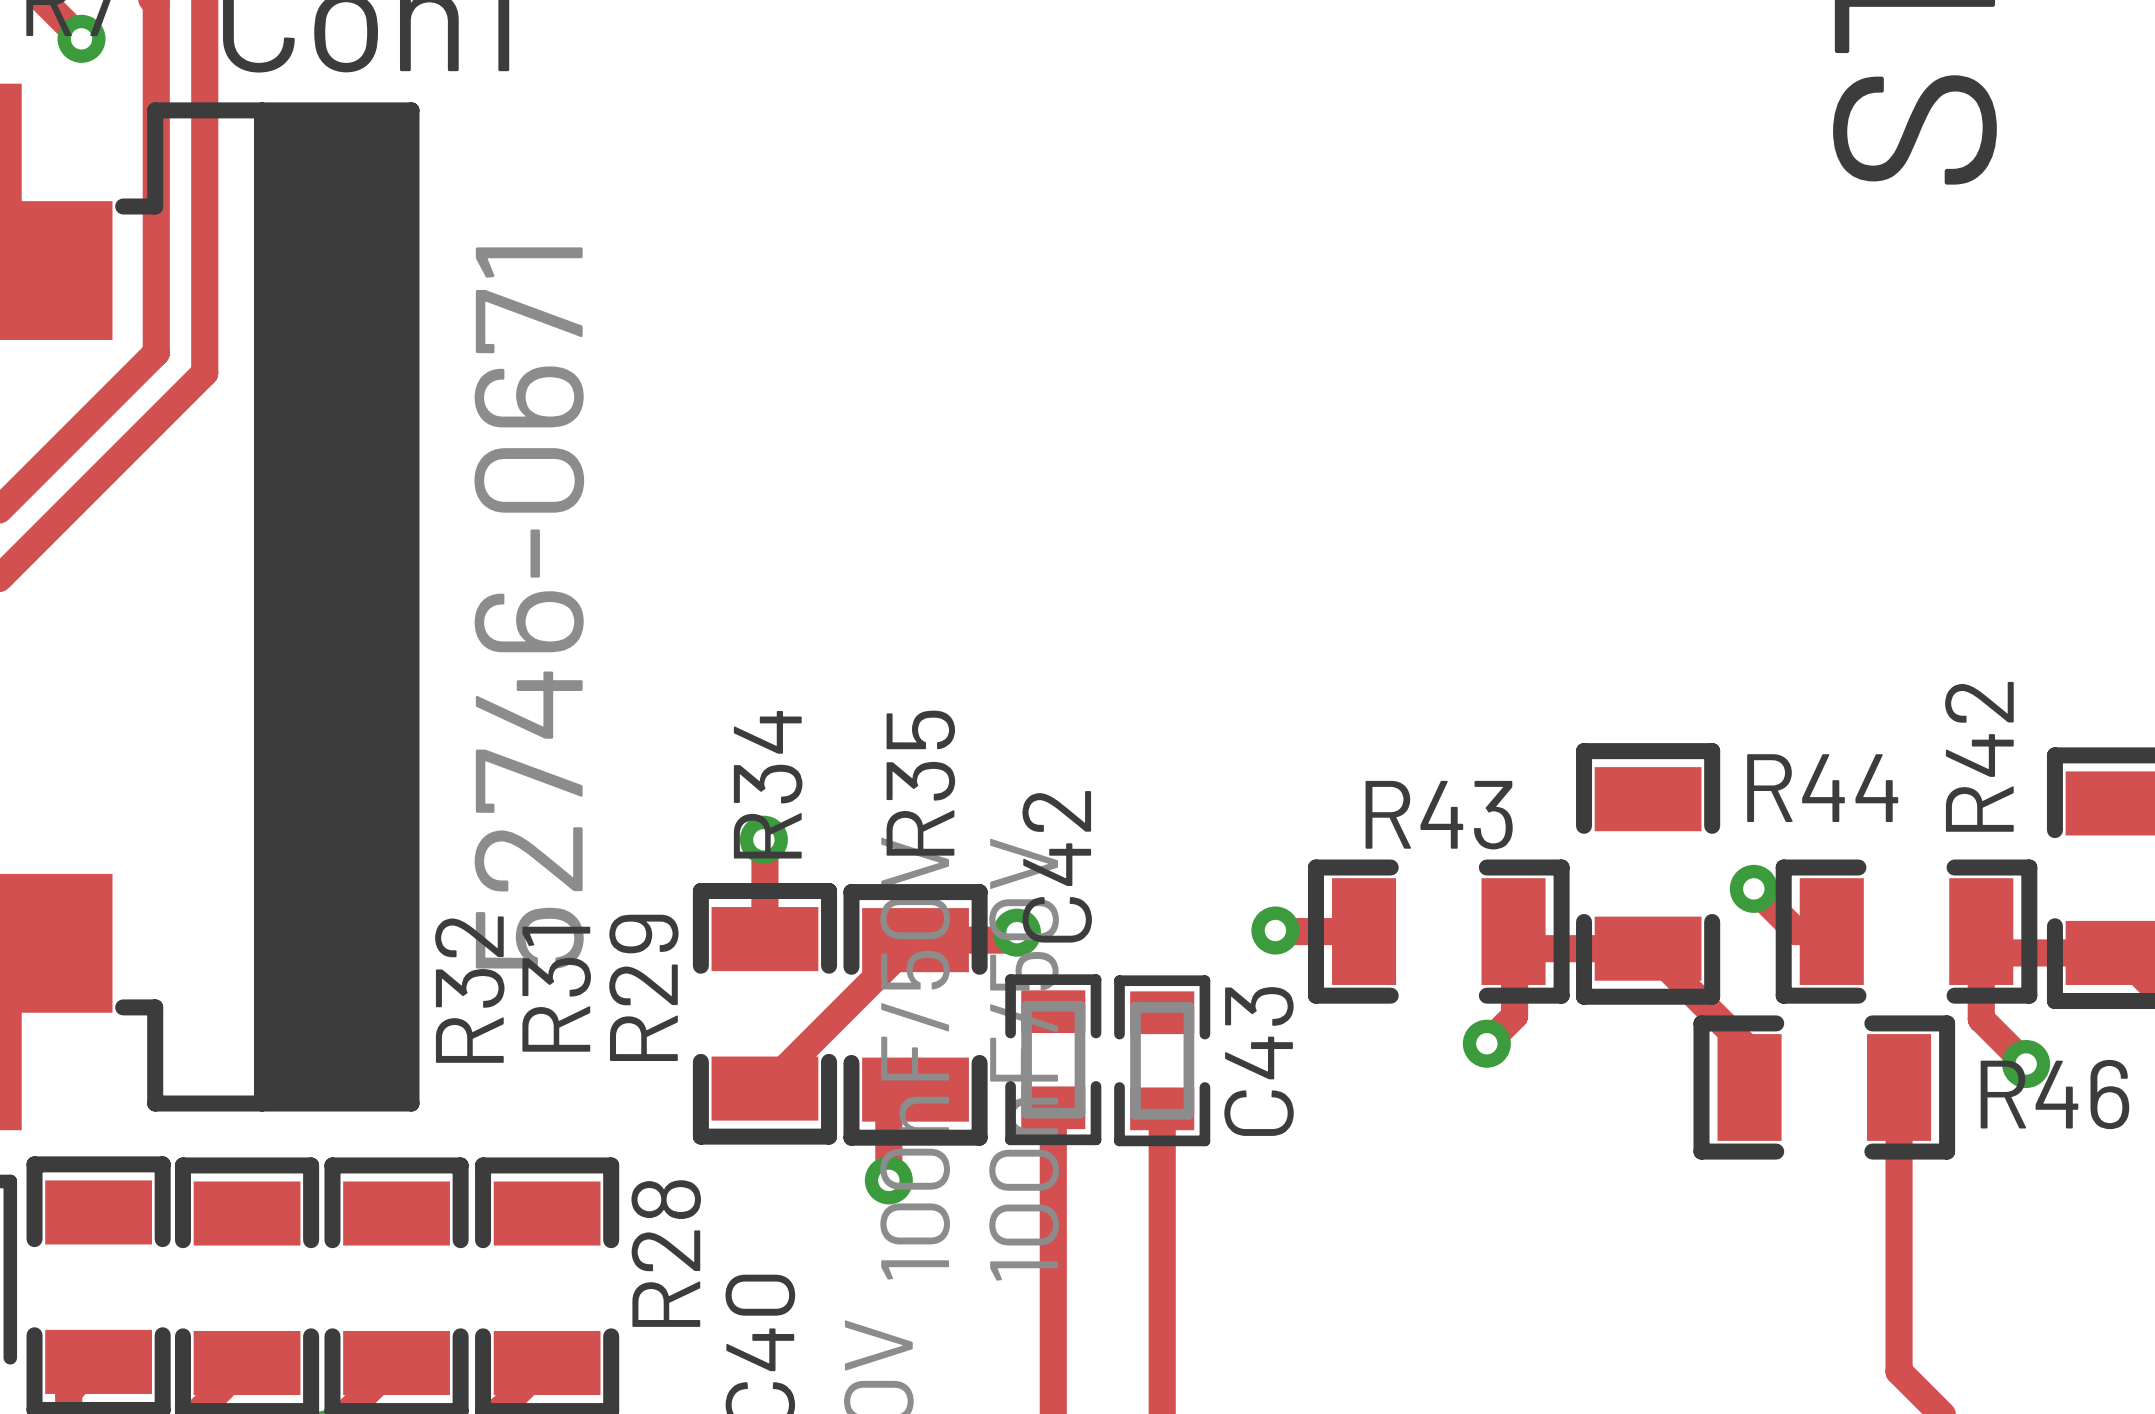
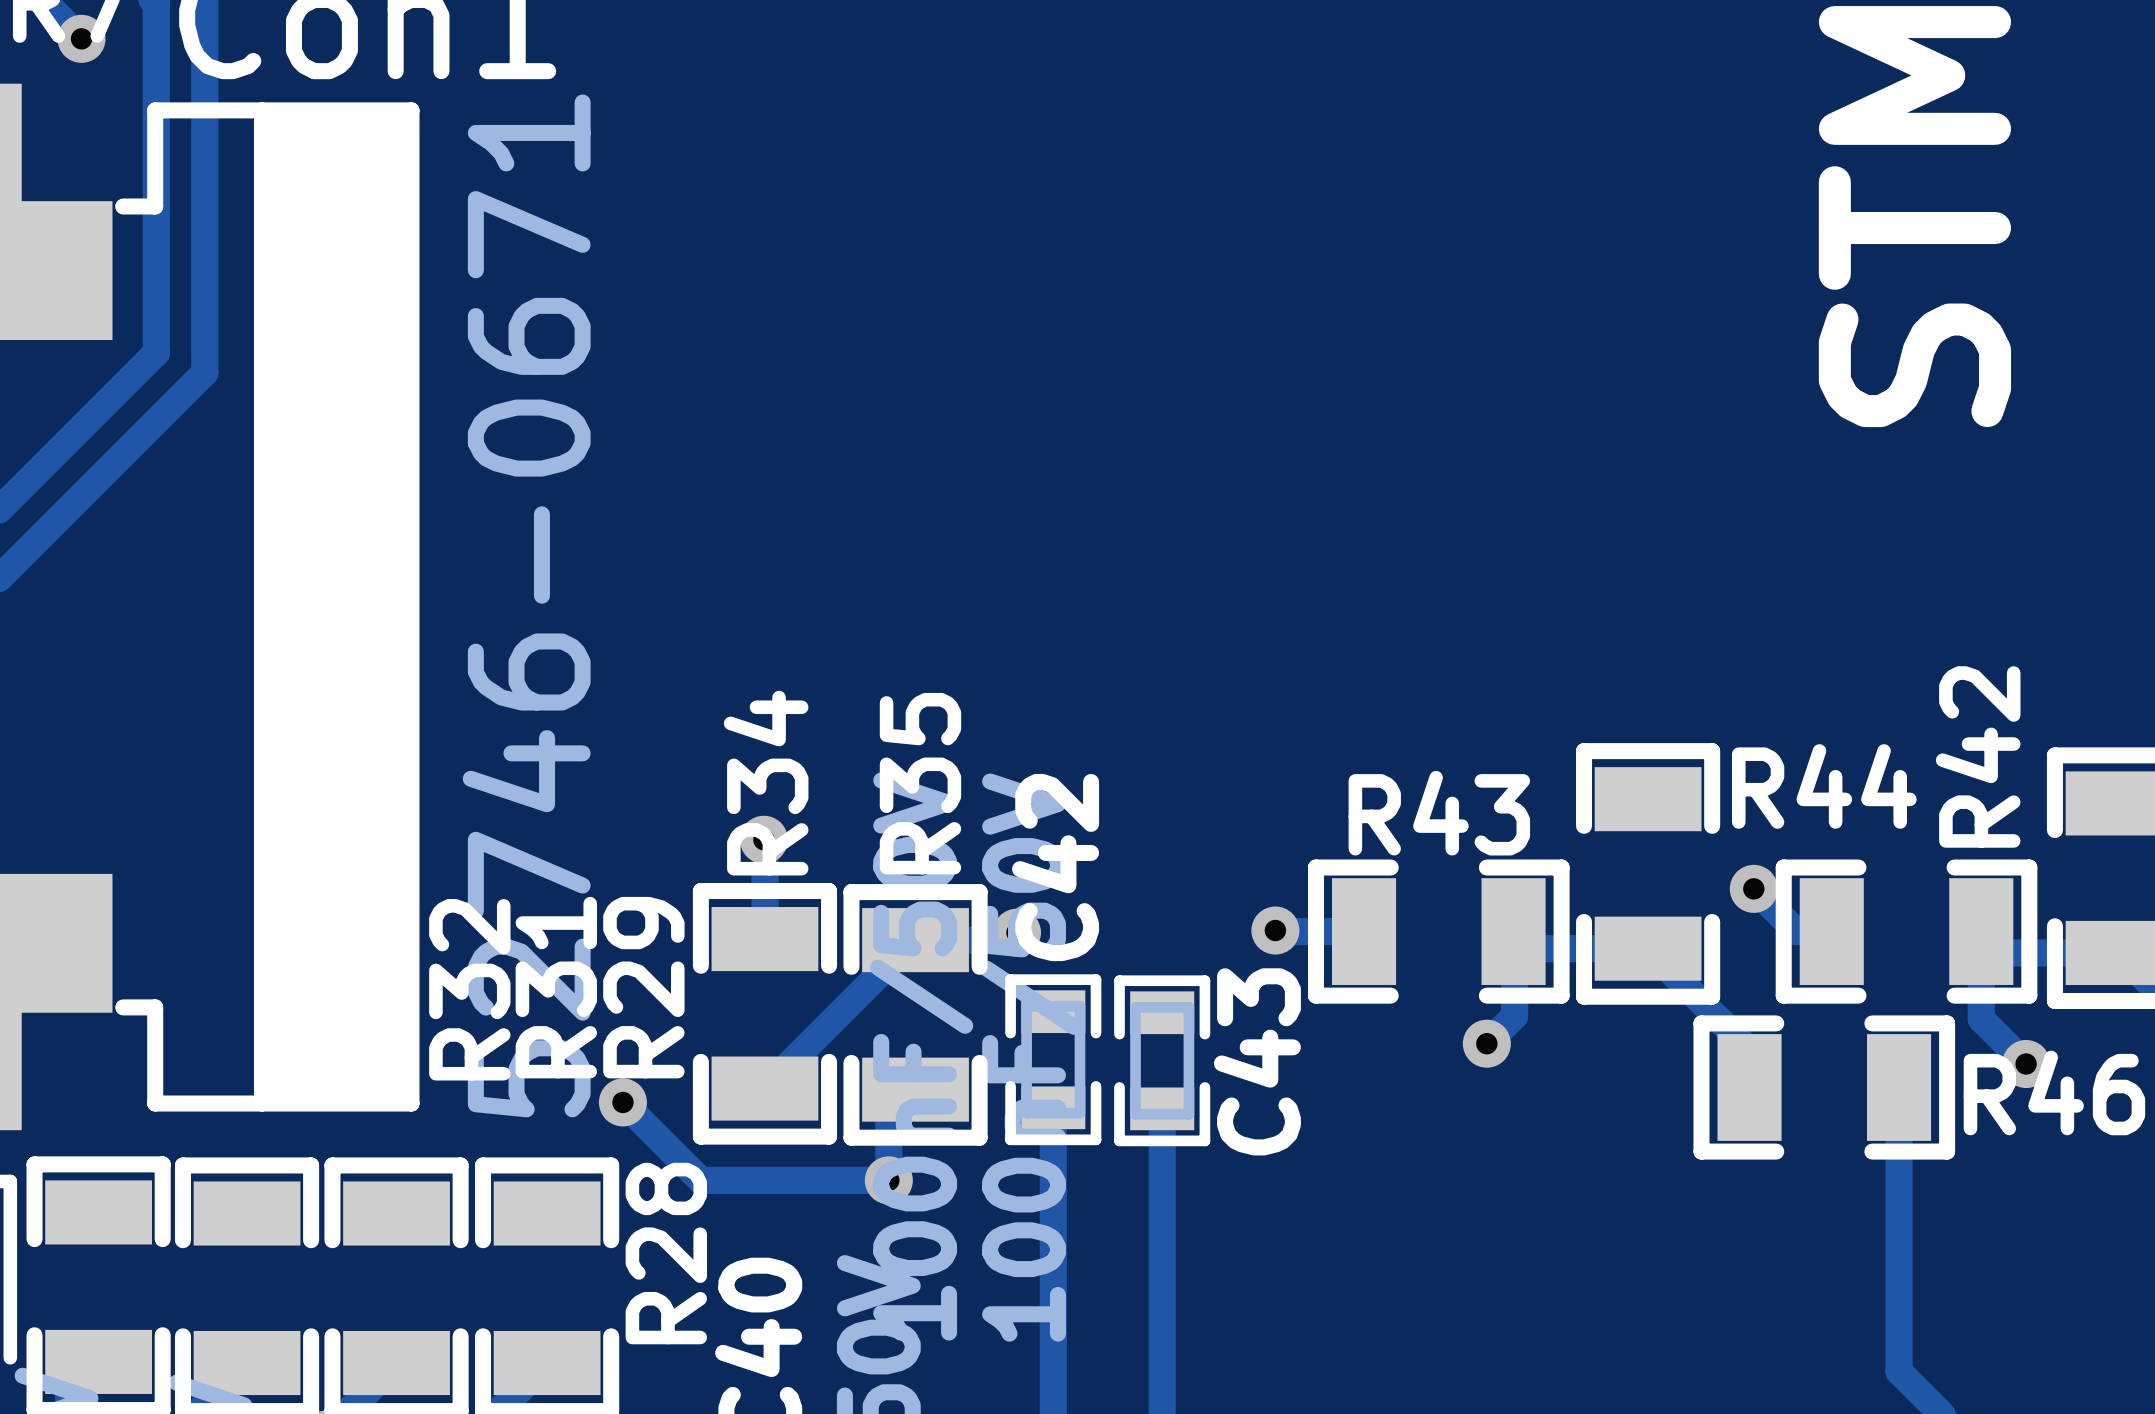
track: none -> (622, 1102) (700, 1180) (888, 1180)
via: none -> (622, 1102)

